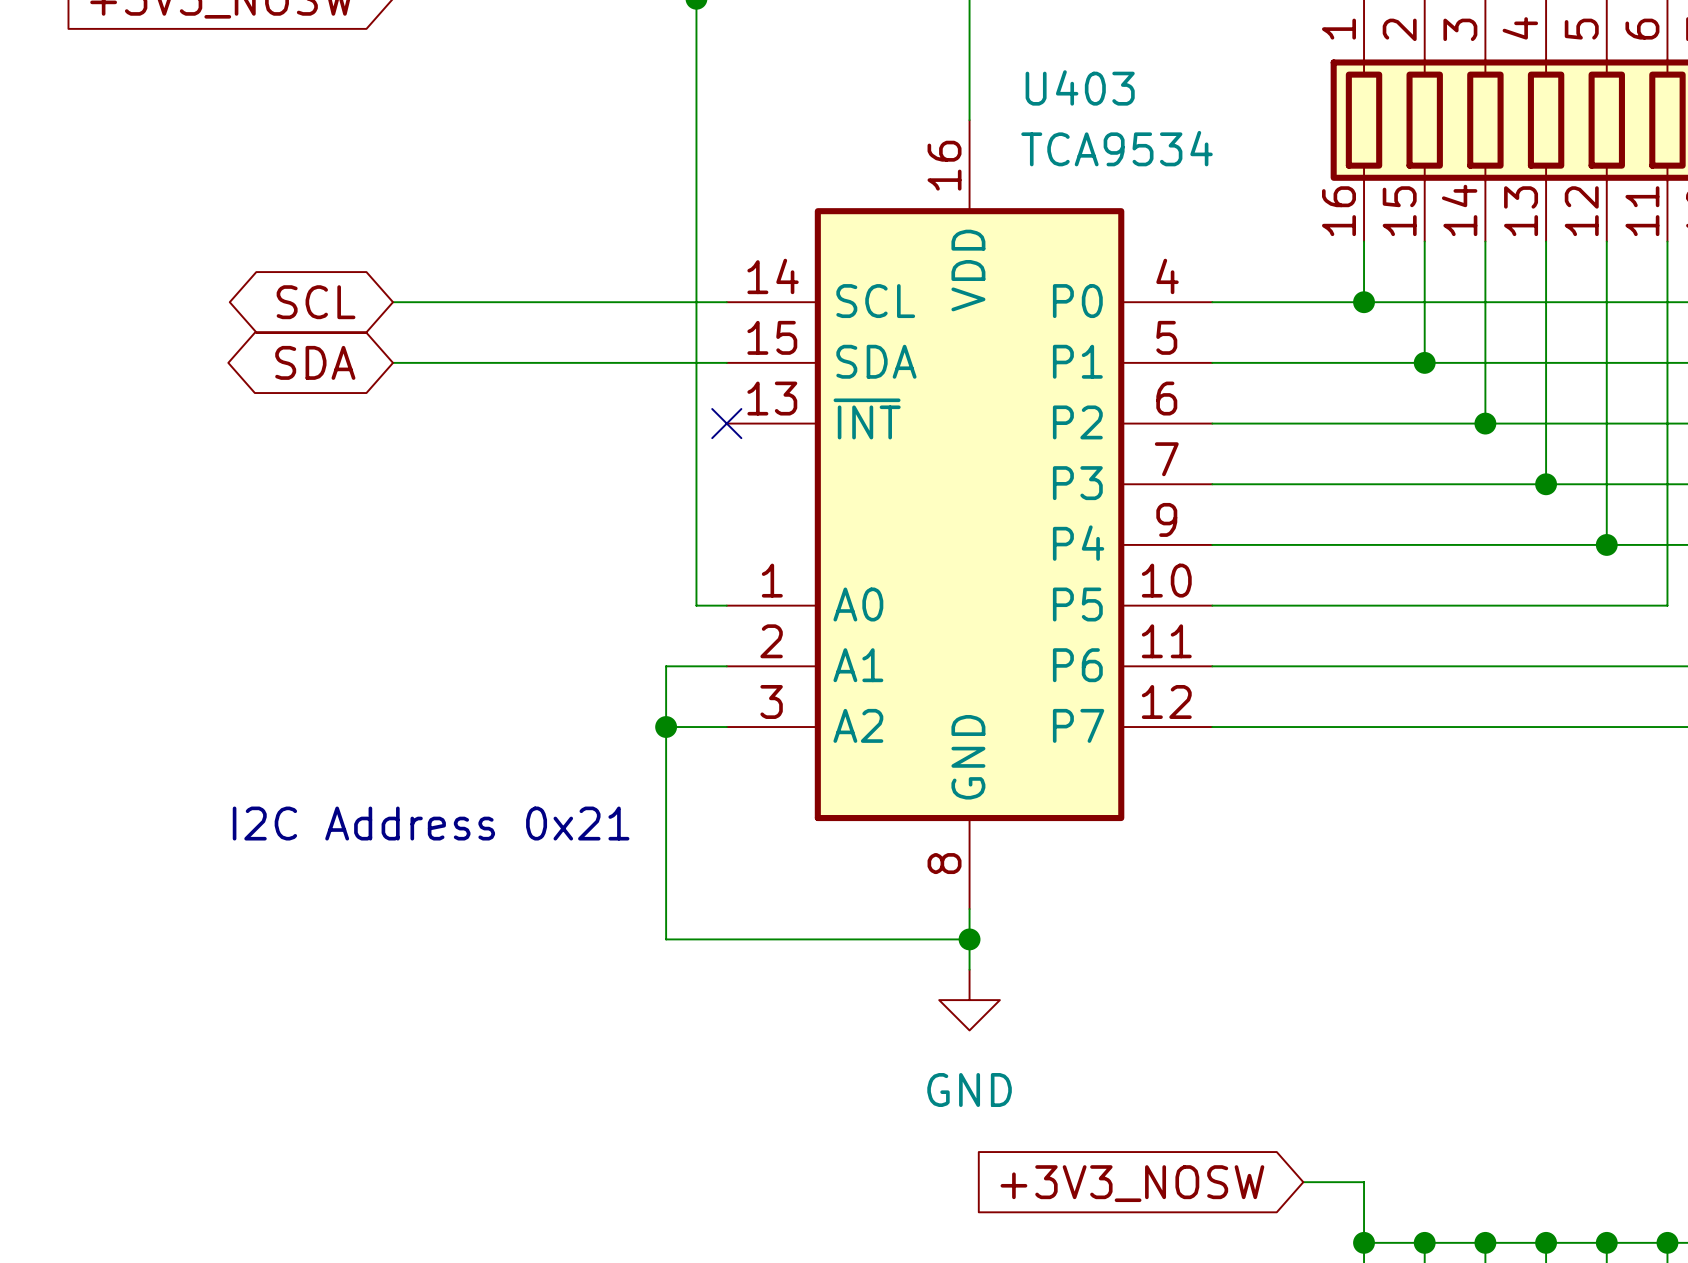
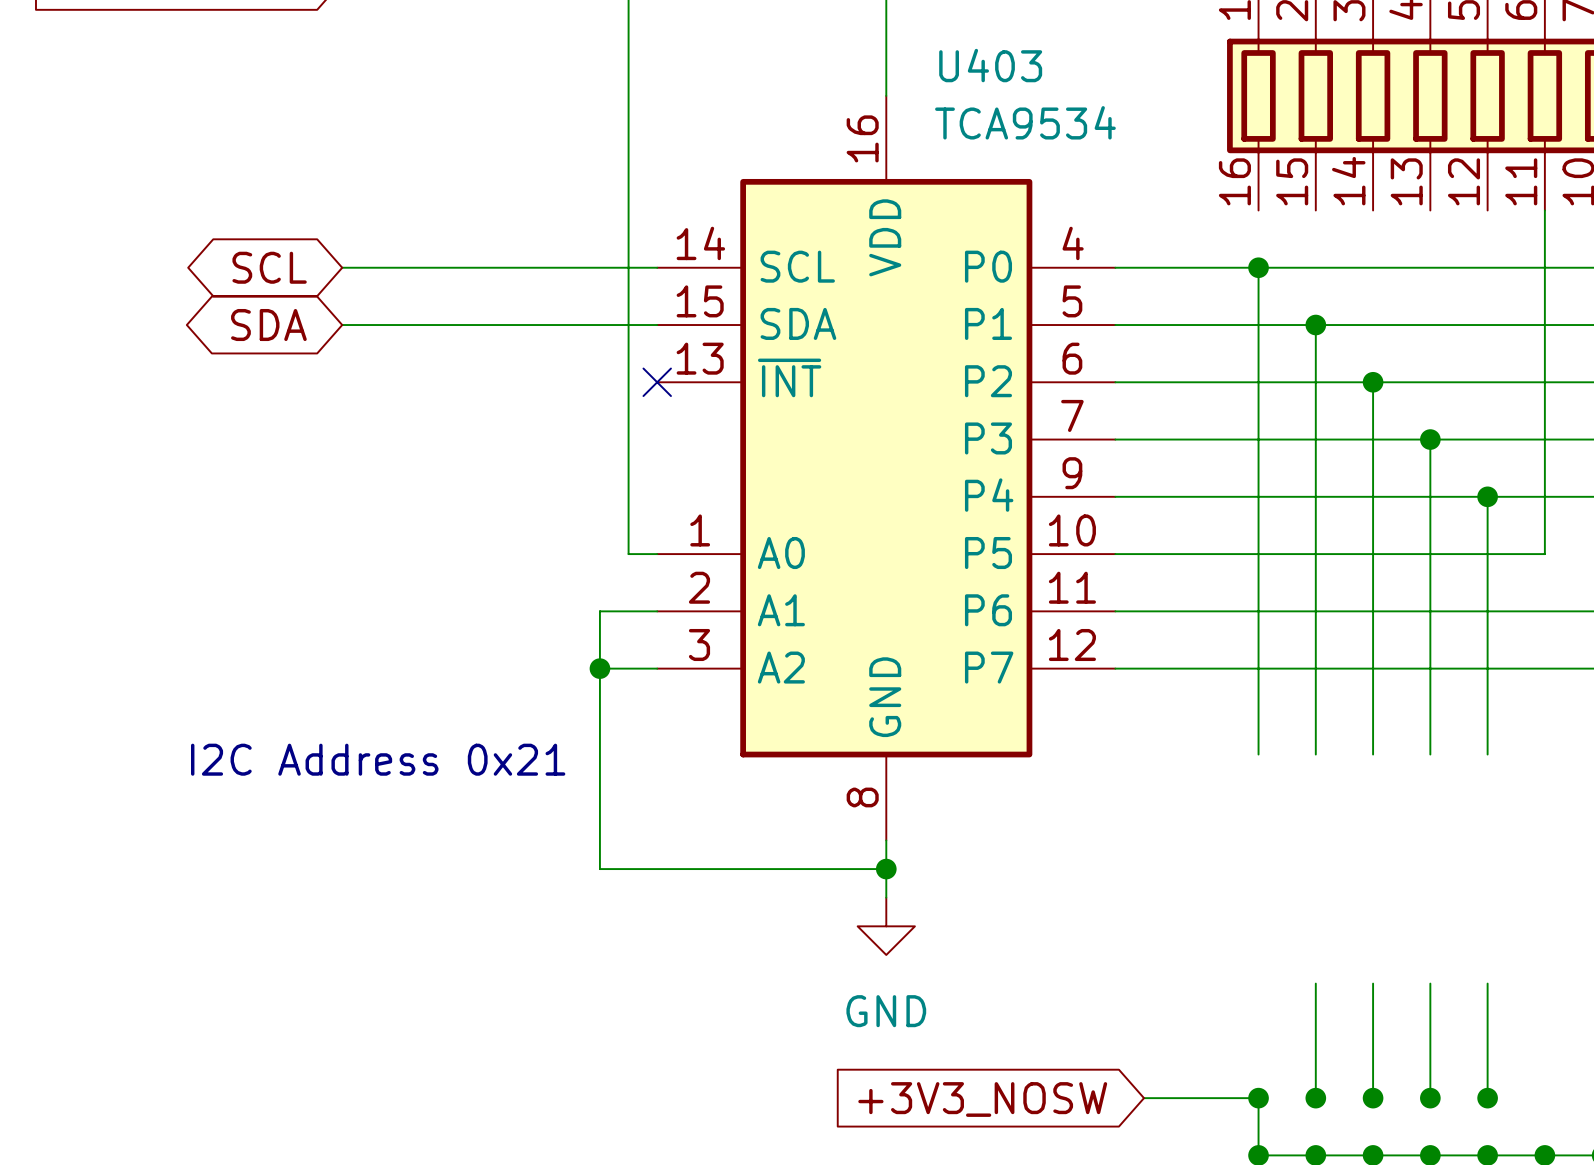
wire: (1364, 241) (1364, 302) -> (1258, 754) (1258, 267)
wire: (1424, 241) (1424, 362) -> (1315, 754) (1315, 325)
wire: (1485, 241) (1485, 423) -> (1373, 754) (1373, 382)
wire: (1546, 241) (1546, 484) -> (1430, 754) (1430, 439)
wire: (1606, 241) (1606, 544) -> (1487, 754) (1487, 496)
wire: none -> (1315, 983) (1315, 1098)
wire: none -> (1373, 983) (1373, 1098)
wire: none -> (1430, 983) (1430, 1098)
wire: none -> (1487, 983) (1487, 1098)
wire: none -> (1144, 1098) (1201, 1098)
junction: none -> (1258, 1098)
junction: none -> (1315, 1098)
junction: none -> (1373, 1098)
junction: none -> (1430, 1098)
junction: none -> (1487, 1098)
global label position: +3V3_NOSW (1132, 1183) -> +3V3_NOSW (982, 1099)

